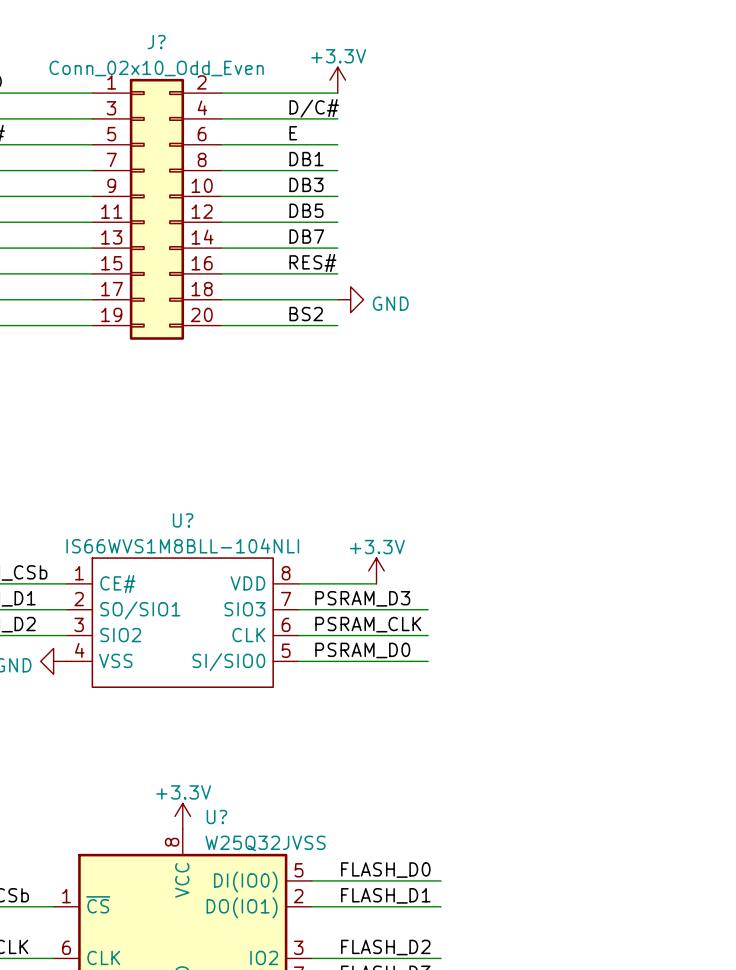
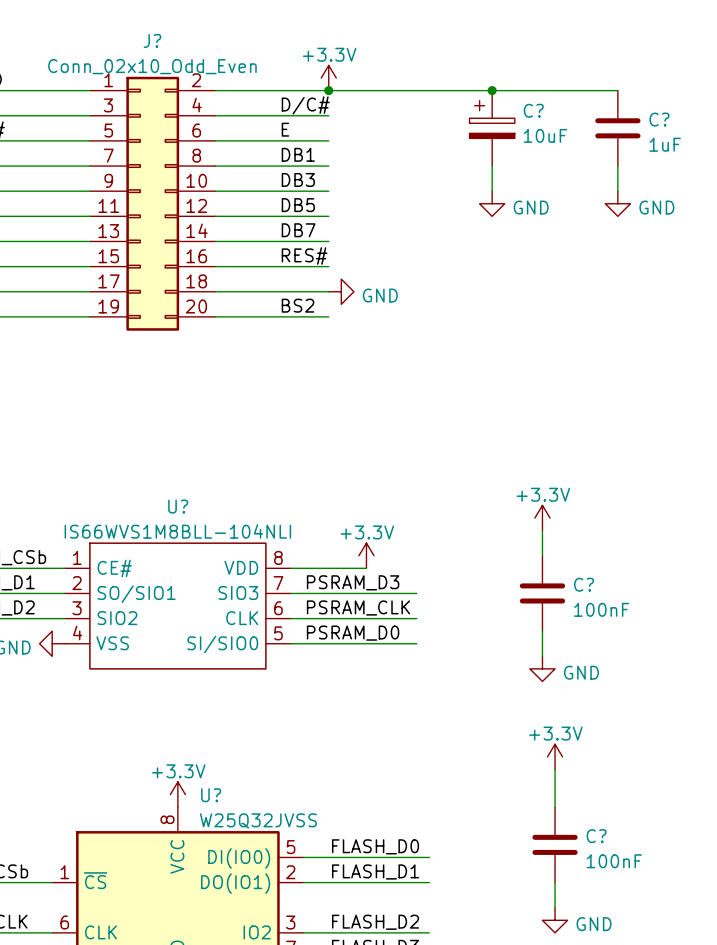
wire: none -> (328, 90) (617, 90)
junction: none -> (328, 90)
junction: none -> (492, 90)
C?: none -> 10uF (492, 128)
C?: none -> 1uF (617, 128)
wire: none -> (492, 166) (492, 191)
wire: none -> (617, 166) (617, 191)
power symbol: none -> GND (492, 203)
power symbol: none -> GND (617, 203)
power symbol: none -> +3.3V (542, 518)
wire: none -> (542, 530) (542, 555)
C?: none -> 100nF (542, 593)
wire: none -> (542, 631) (542, 656)
power symbol: none -> GND (542, 668)
power symbol: none -> +3.3V (555, 756)
wire: none -> (555, 769) (555, 807)
C?: none -> 100nF (555, 844)
wire: none -> (555, 882) (555, 907)
power symbol: none -> GND (555, 920)

